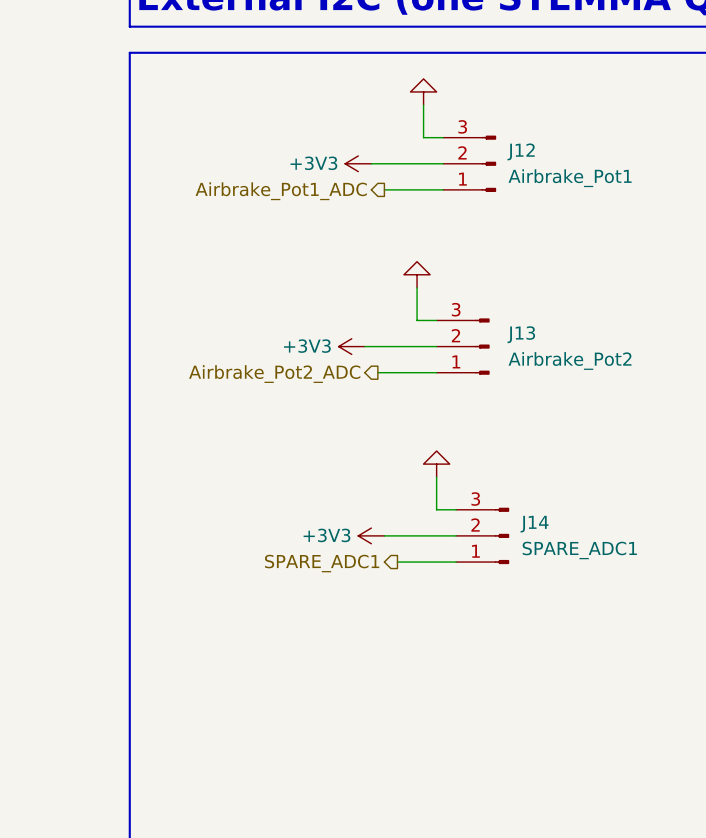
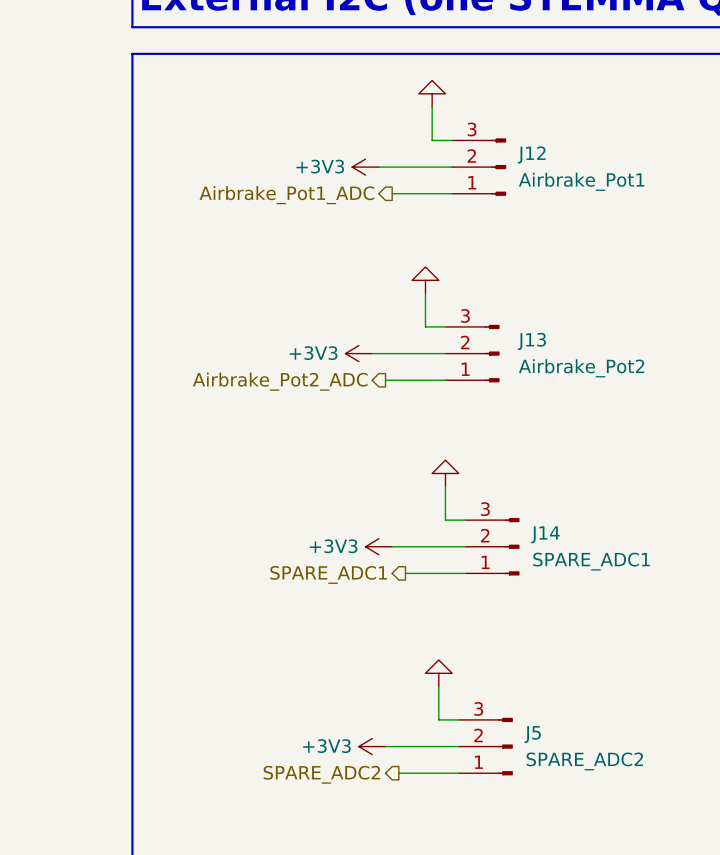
power symbol: none -> (438, 673)
wire: none -> (438, 686) (438, 719) (458, 719)
power symbol: none -> +3V3 (372, 746)
wire: none -> (385, 746) (458, 746)
J5: none -> SPARE_ADC2 (485, 746)
wire: none -> (398, 773) (458, 773)
hierarchical label: none -> SPARE_ADC2 (321, 774)

